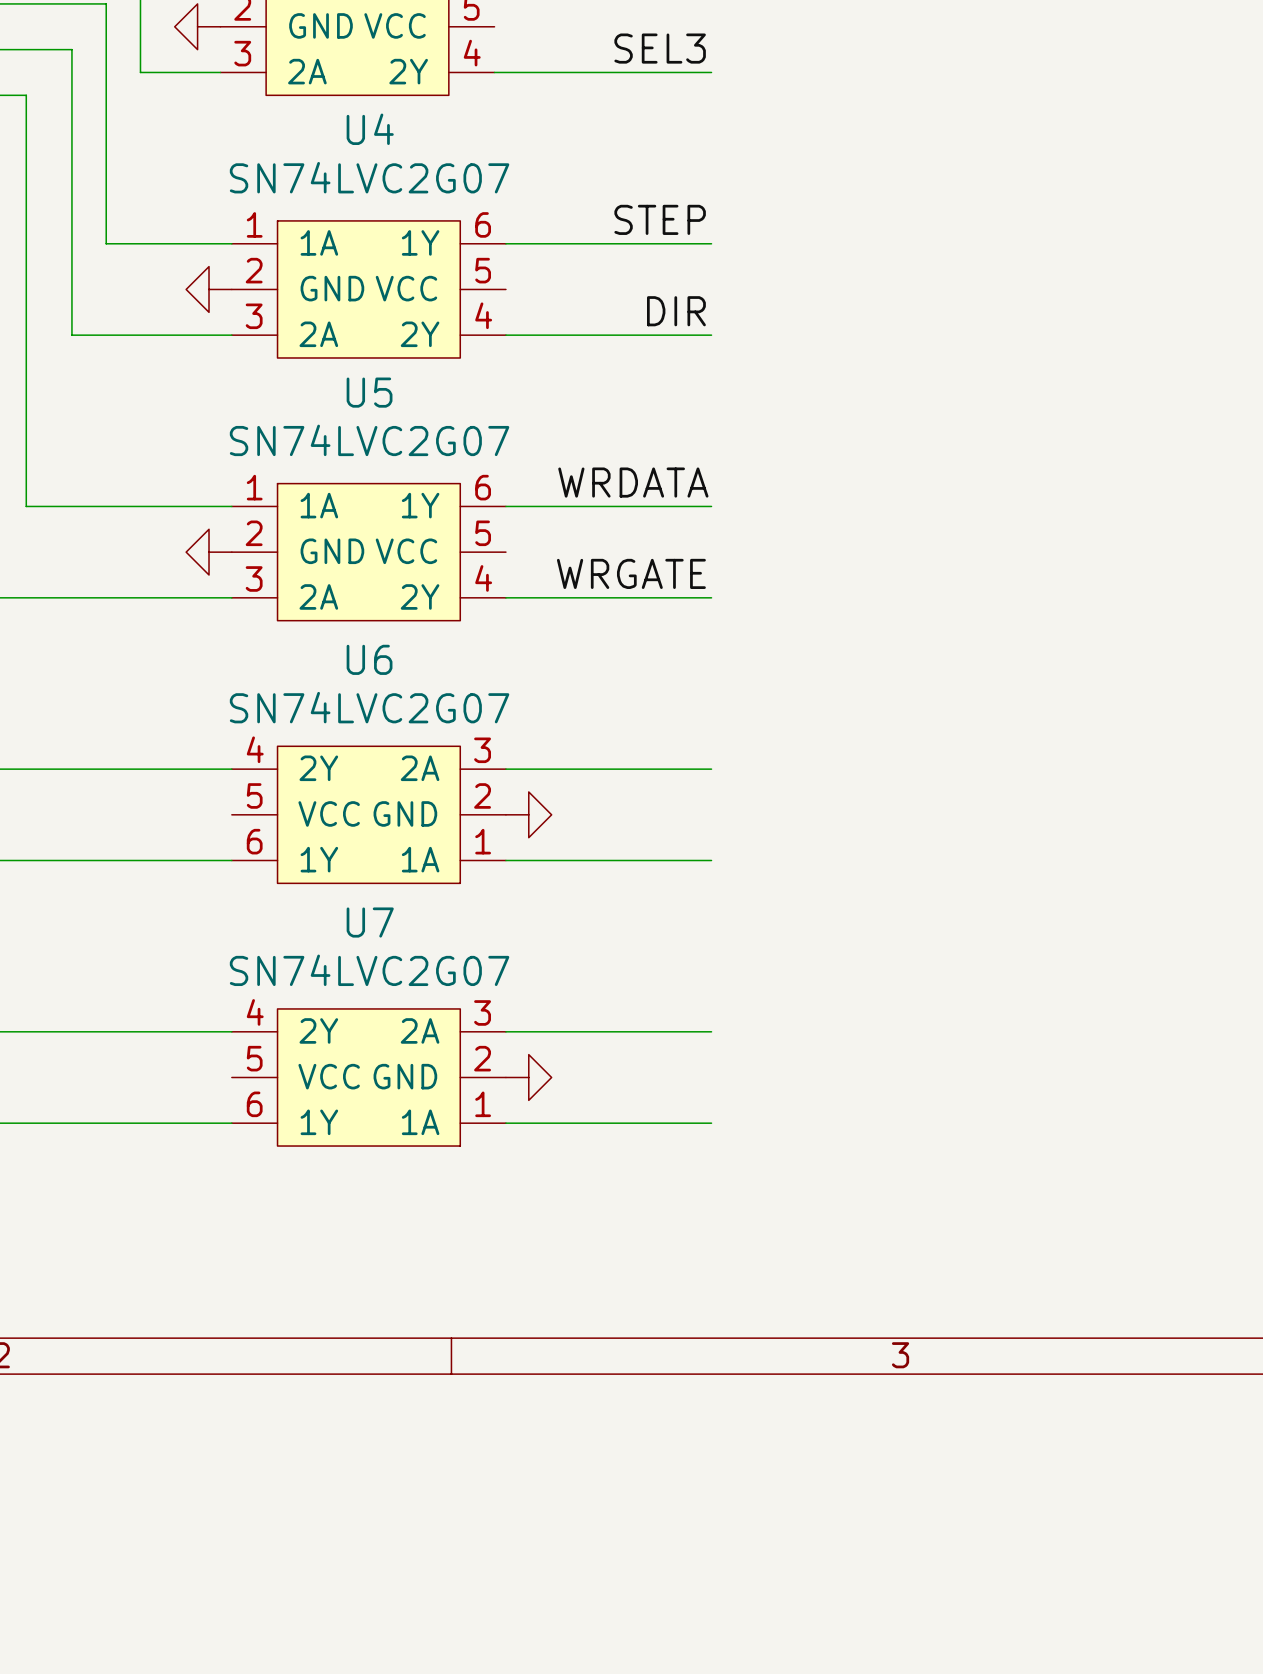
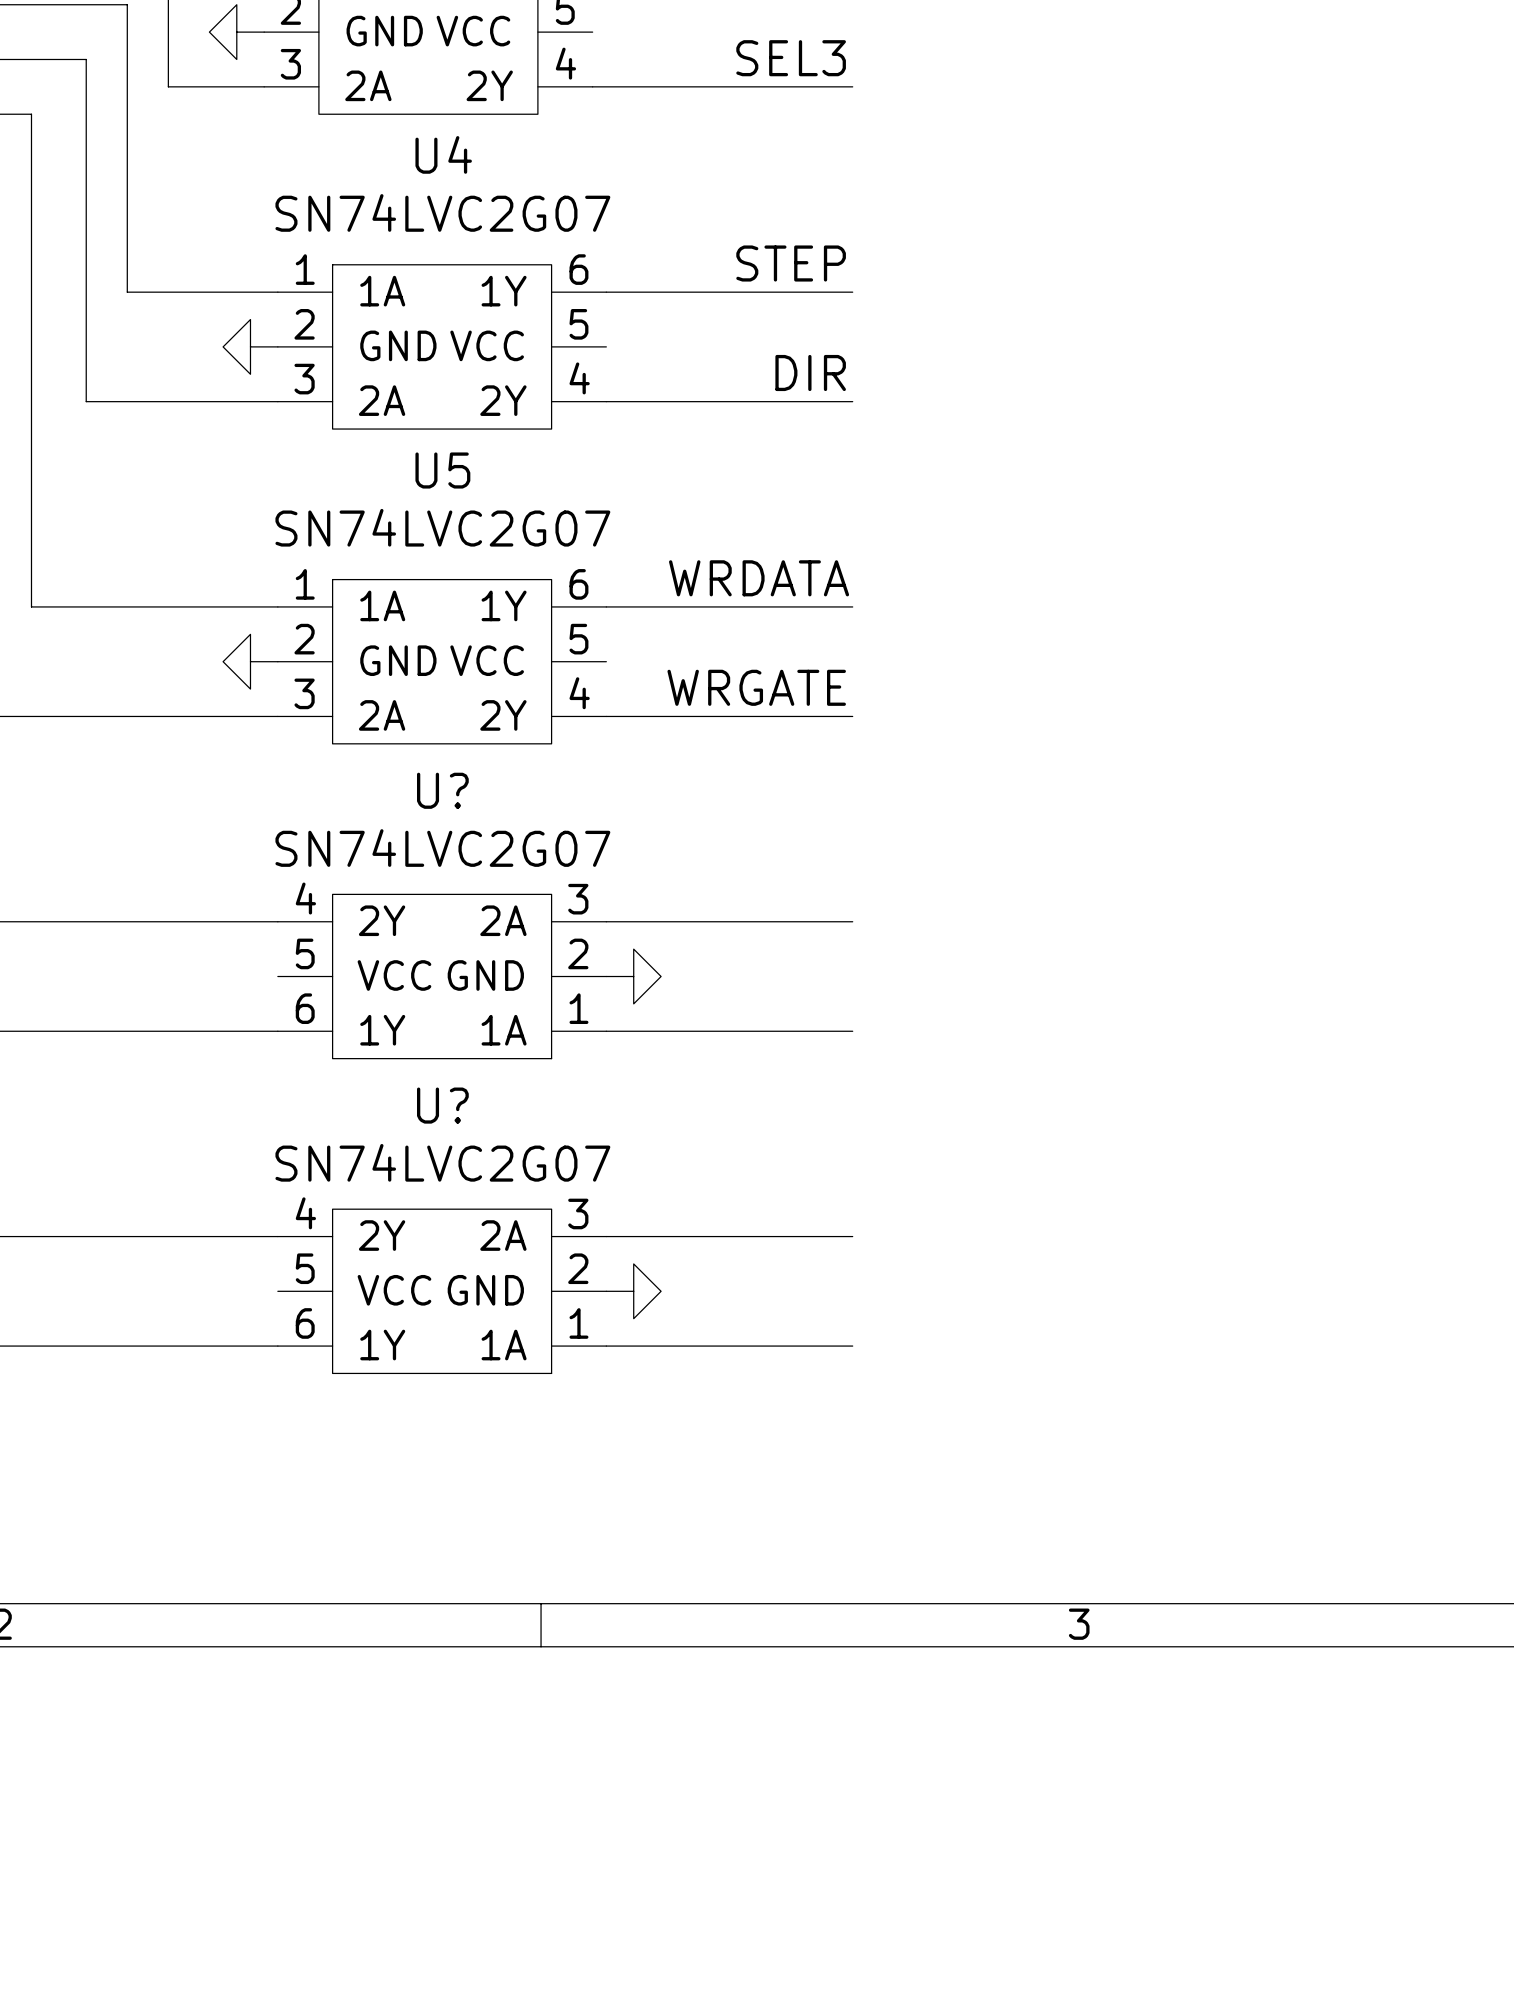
U6 name: U6 (369, 659) -> U? (442, 790)
U7 name: U7 (370, 922) -> U? (442, 1105)

